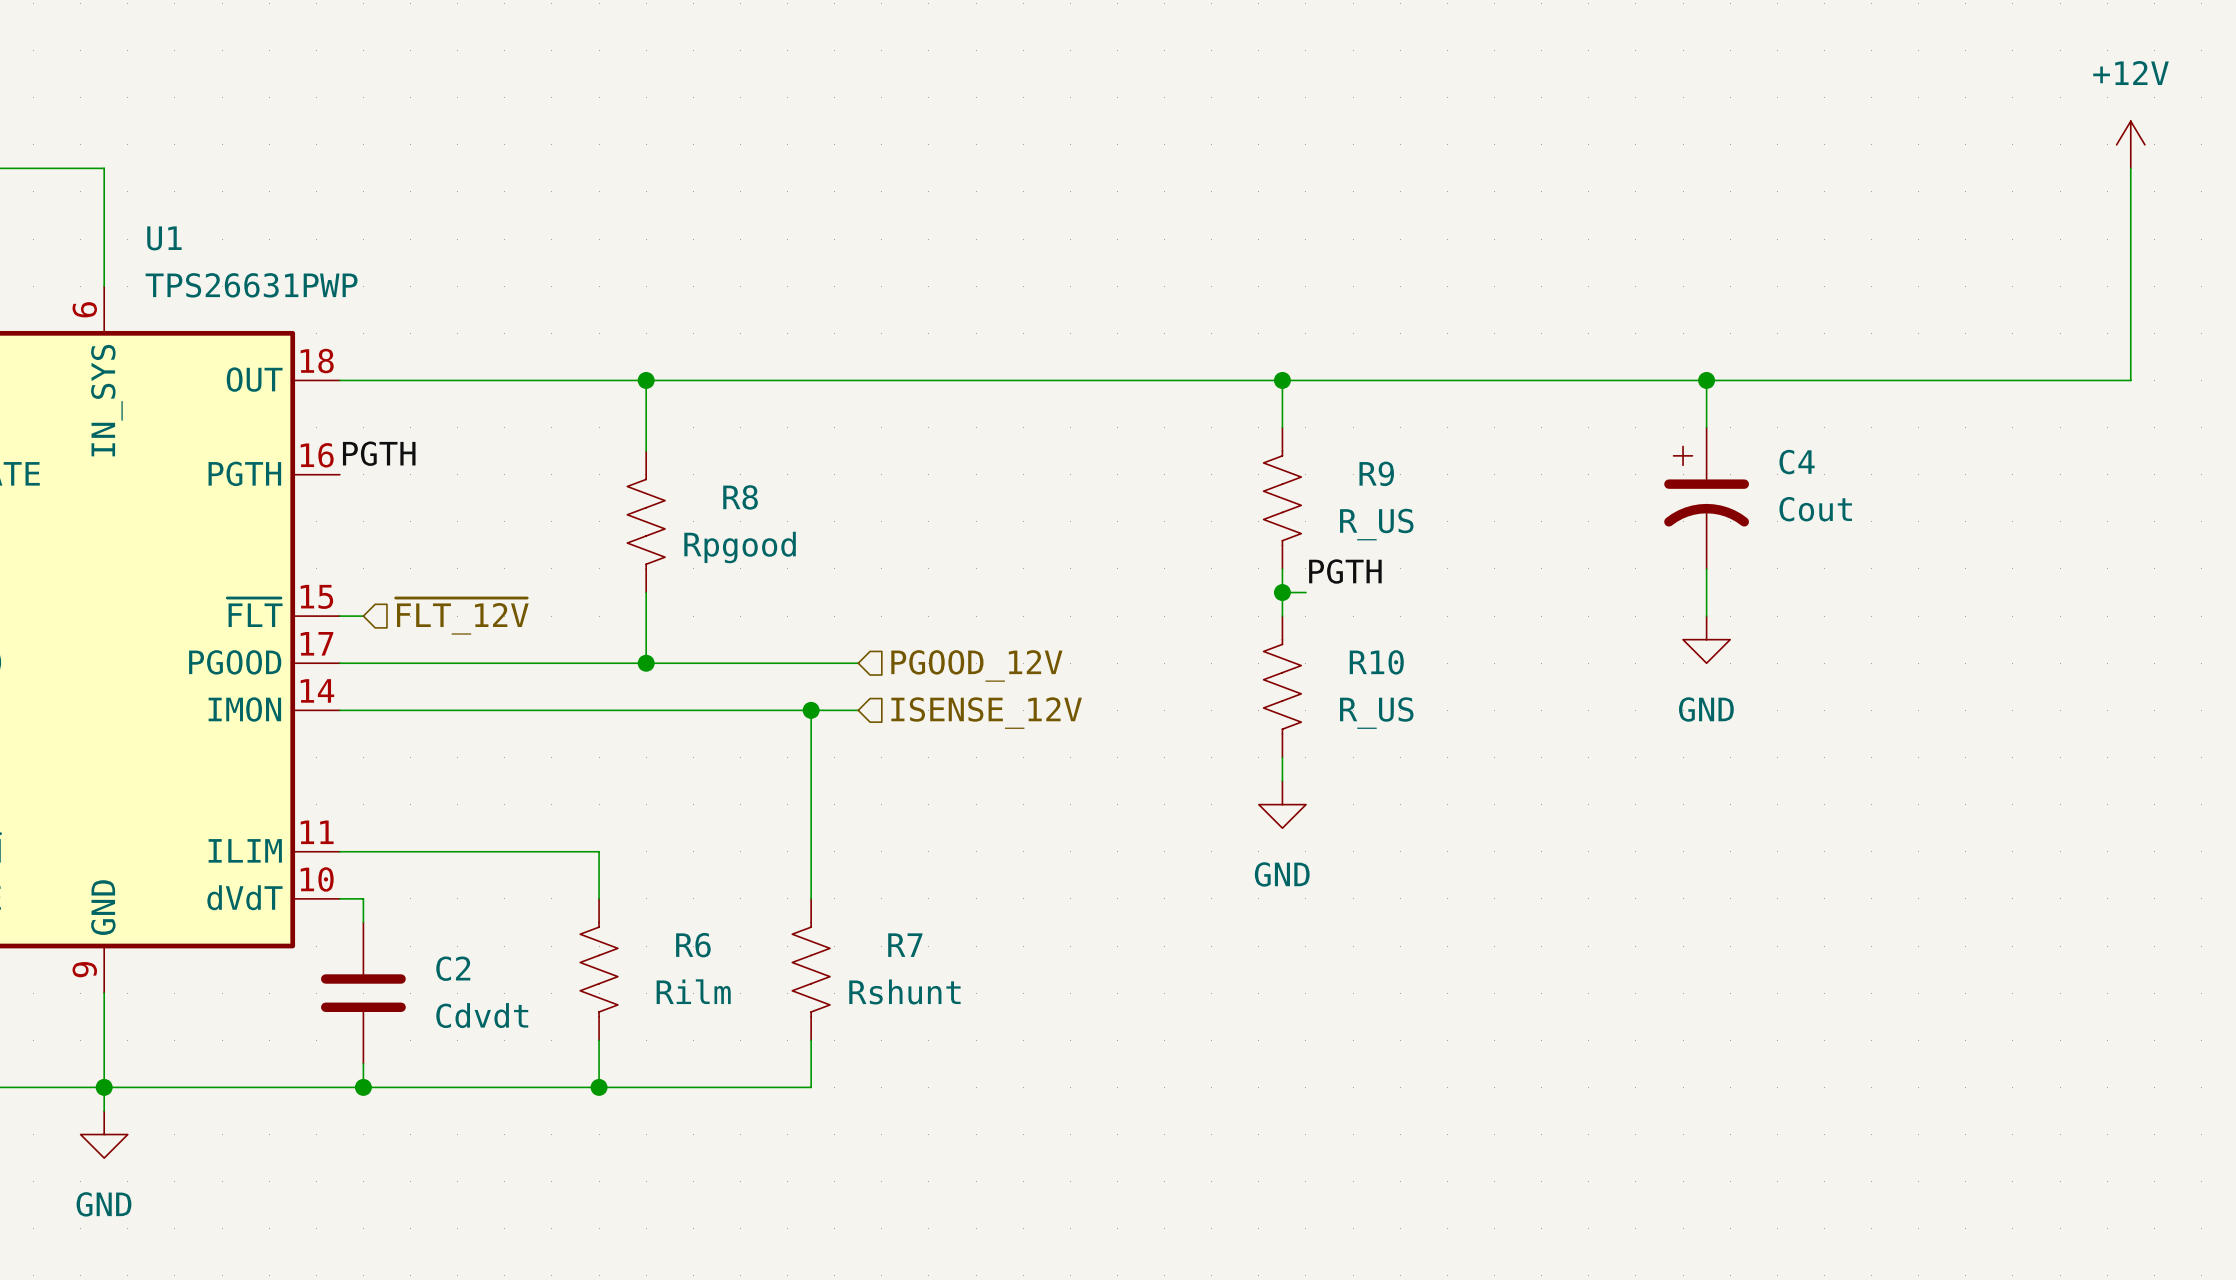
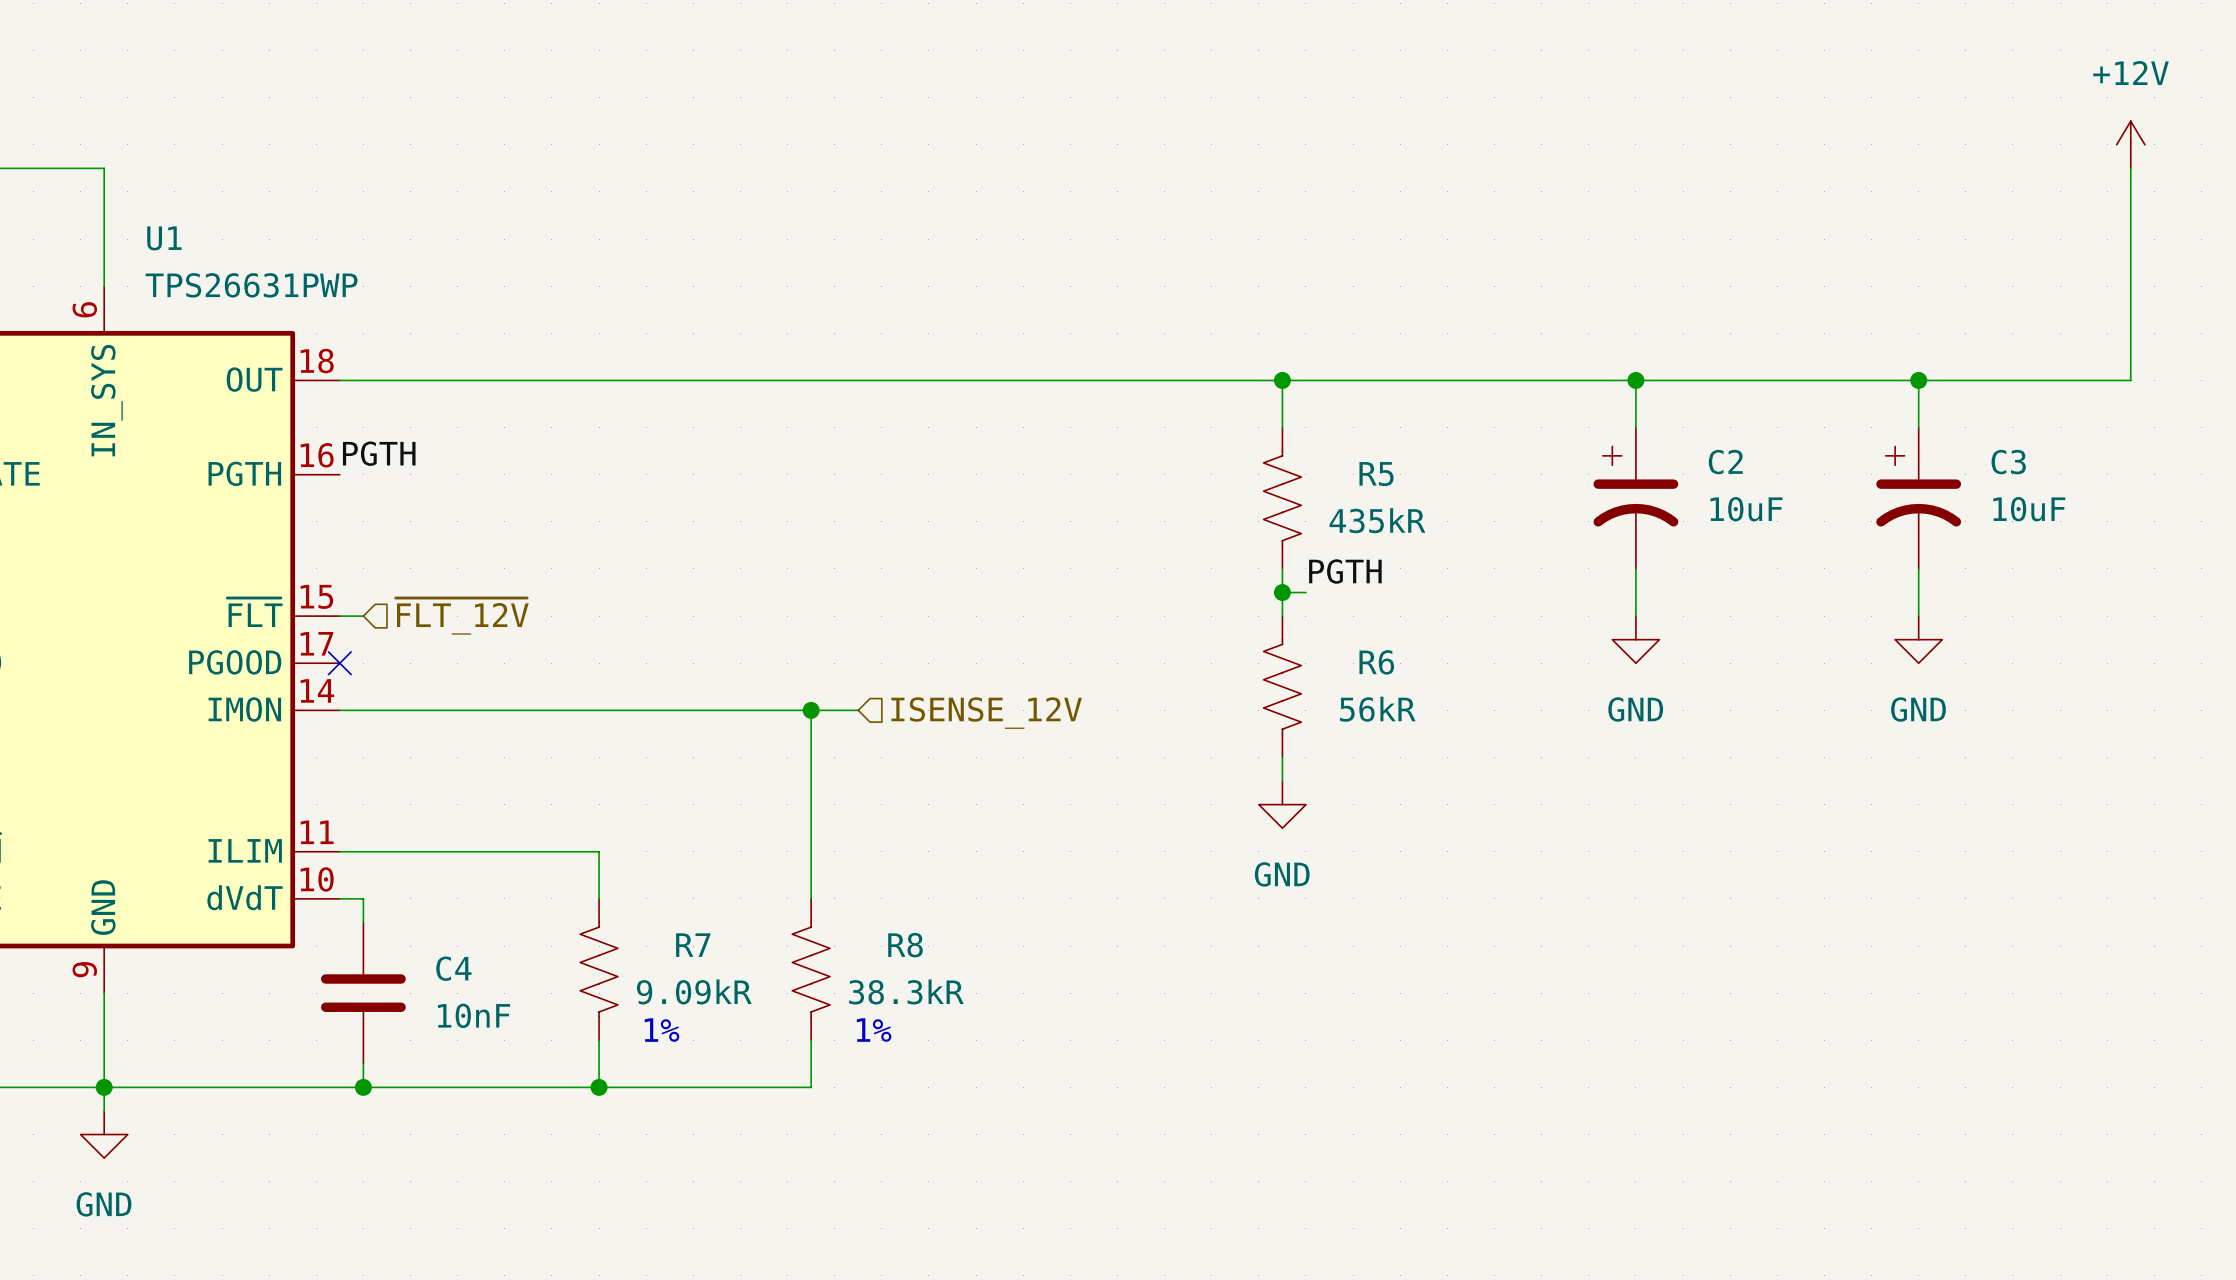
wire: (646, 380) (646, 451) -> none
junction: (646, 380) -> none
wire: (1706, 380) (1706, 427) -> (1635, 380) (1635, 427)
junction position: (1706, 380) -> (1635, 380)
wire: none -> (1918, 380) (1918, 427)
junction: none -> (1918, 380)
R9 name: R9 (1376, 473) -> R5 (1376, 474)
C2: none -> 10uF (1635, 498)
C4: Cout (1706, 498) -> none
C3: none -> 10uF (1918, 498)
R8: Rpgood (646, 521) -> none
R9 value: R_US (1376, 524) -> 435kR (1377, 520)
wire: (1706, 568) (1706, 616) -> (1635, 568) (1635, 616)
wire: none -> (1918, 568) (1918, 616)
wire: (646, 592) (646, 663) -> none
power symbol position: GND (1706, 639) -> GND (1635, 639)
power symbol: none -> GND (1918, 639)
R10 name: R10 (1376, 662) -> R6 (1376, 662)
wire: (339, 663) (858, 663) -> none
no-connect mark: none -> (339, 663)
junction: (646, 663) -> none
hierarchical label: PGOOD_12V (976, 665) -> none
R10 value: R_US (1376, 713) -> 56kR (1377, 709)
R6 name: R6 (693, 945) -> R7 (693, 945)
R7 name: R7 (905, 945) -> R8 (905, 945)
C2 name: C2 (453, 968) -> C4 (453, 968)
R6 value: Rilm (693, 991) -> 9.09kR (694, 991)
R7 value: Rshunt (904, 991) -> 38.3kR (906, 991)
C2 value: Cdvdt (482, 1015) -> 10nF (474, 1015)
text: none -> 1% (662, 1030)
text: none -> 1% (874, 1030)

